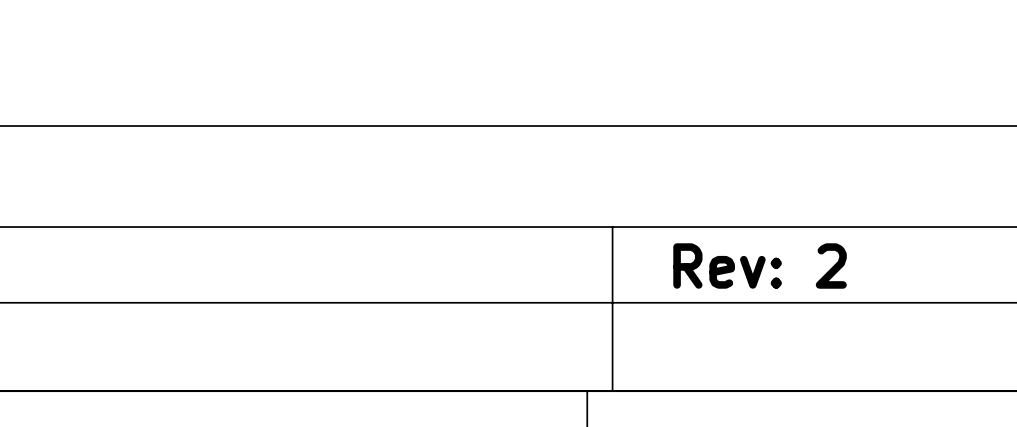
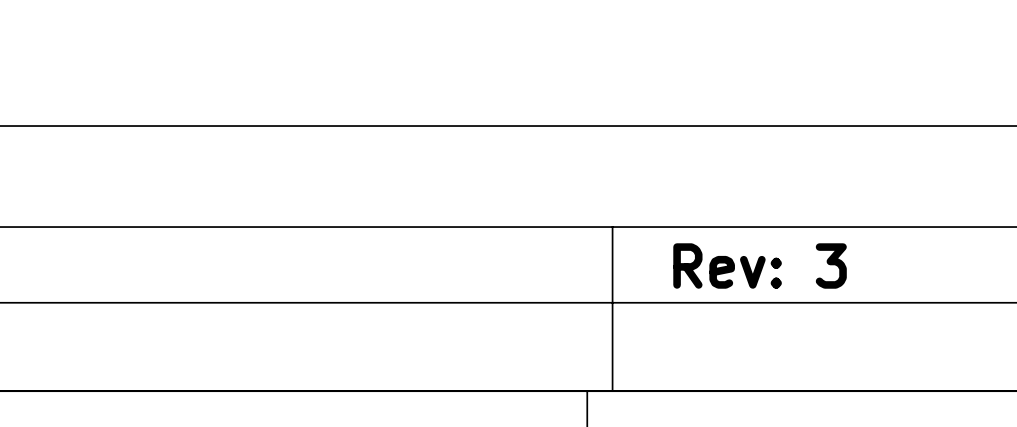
title block: Rev: 2 (760, 266) -> Rev: 3 (760, 266)

